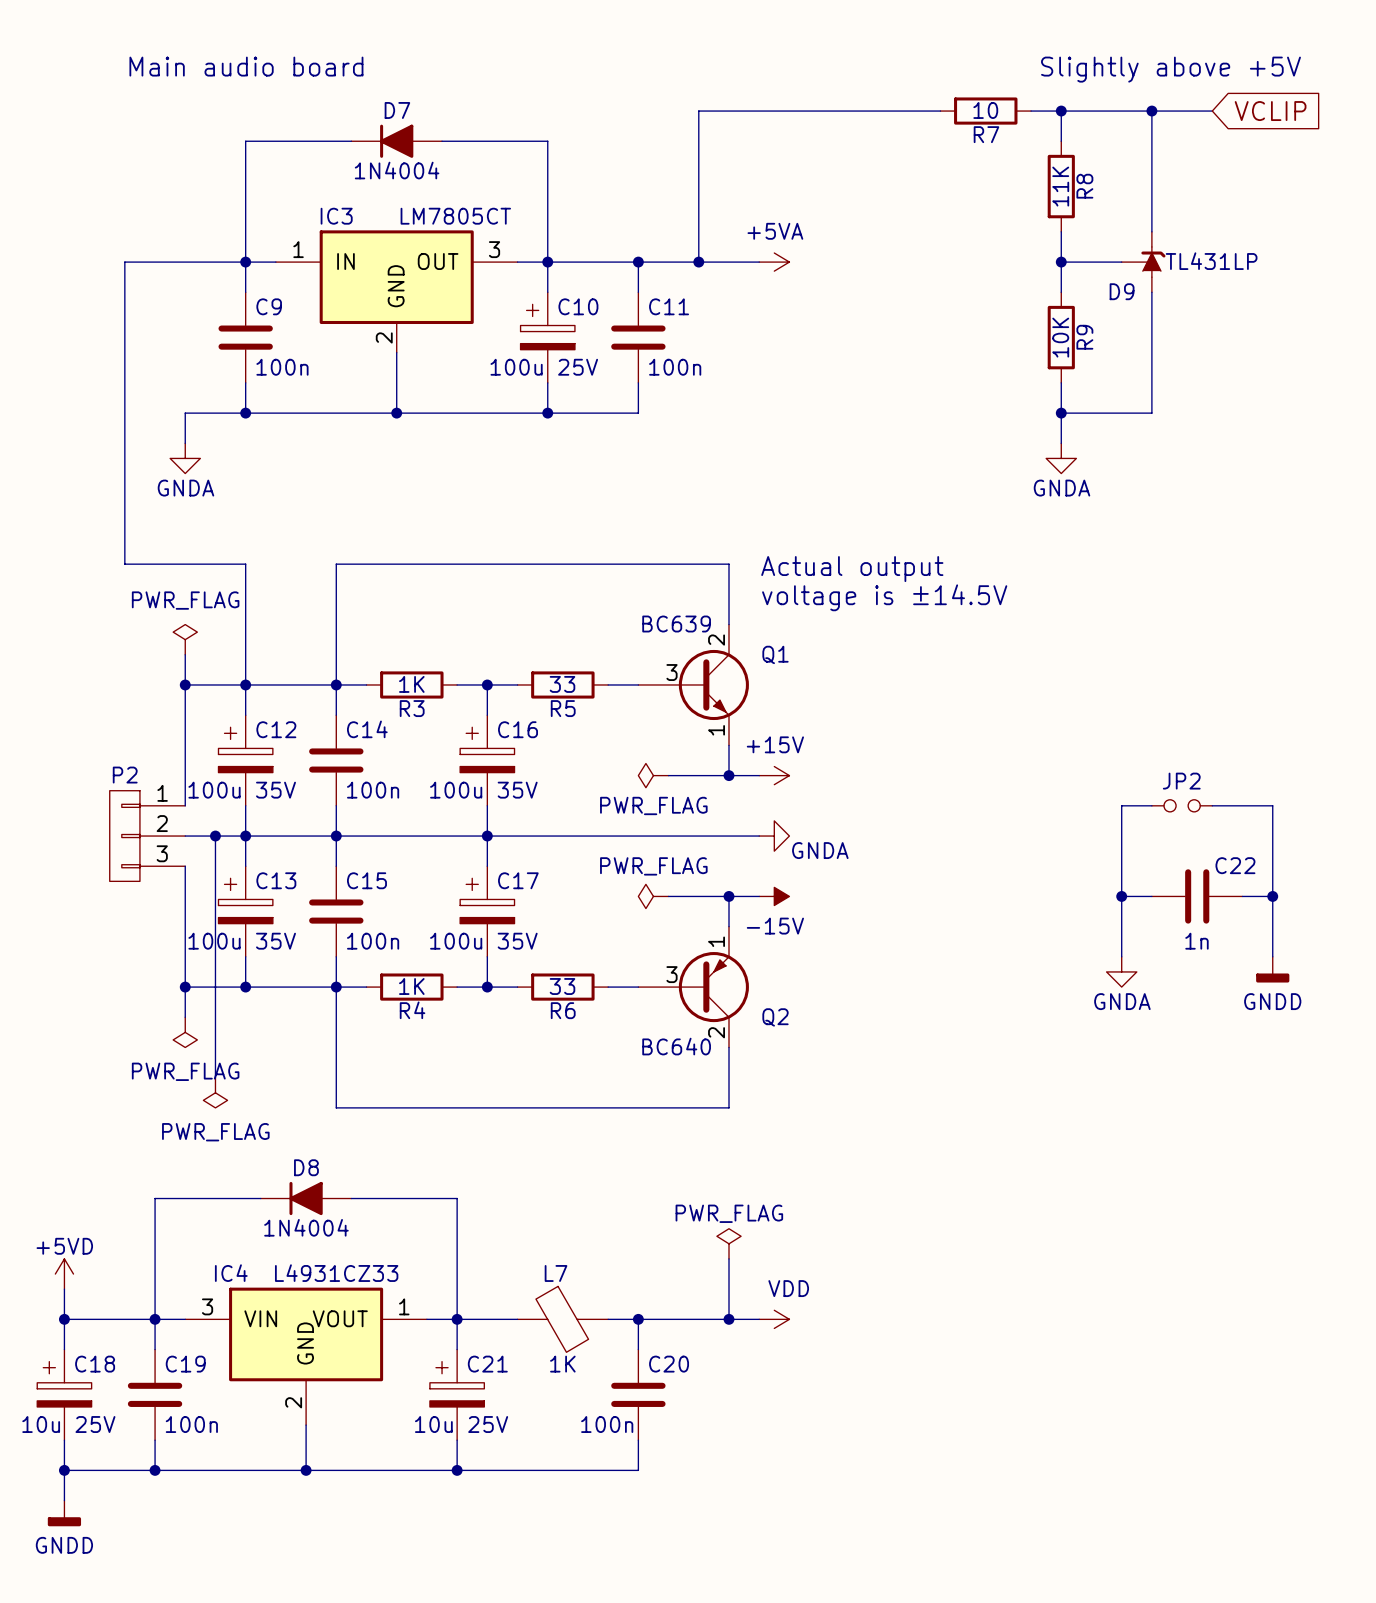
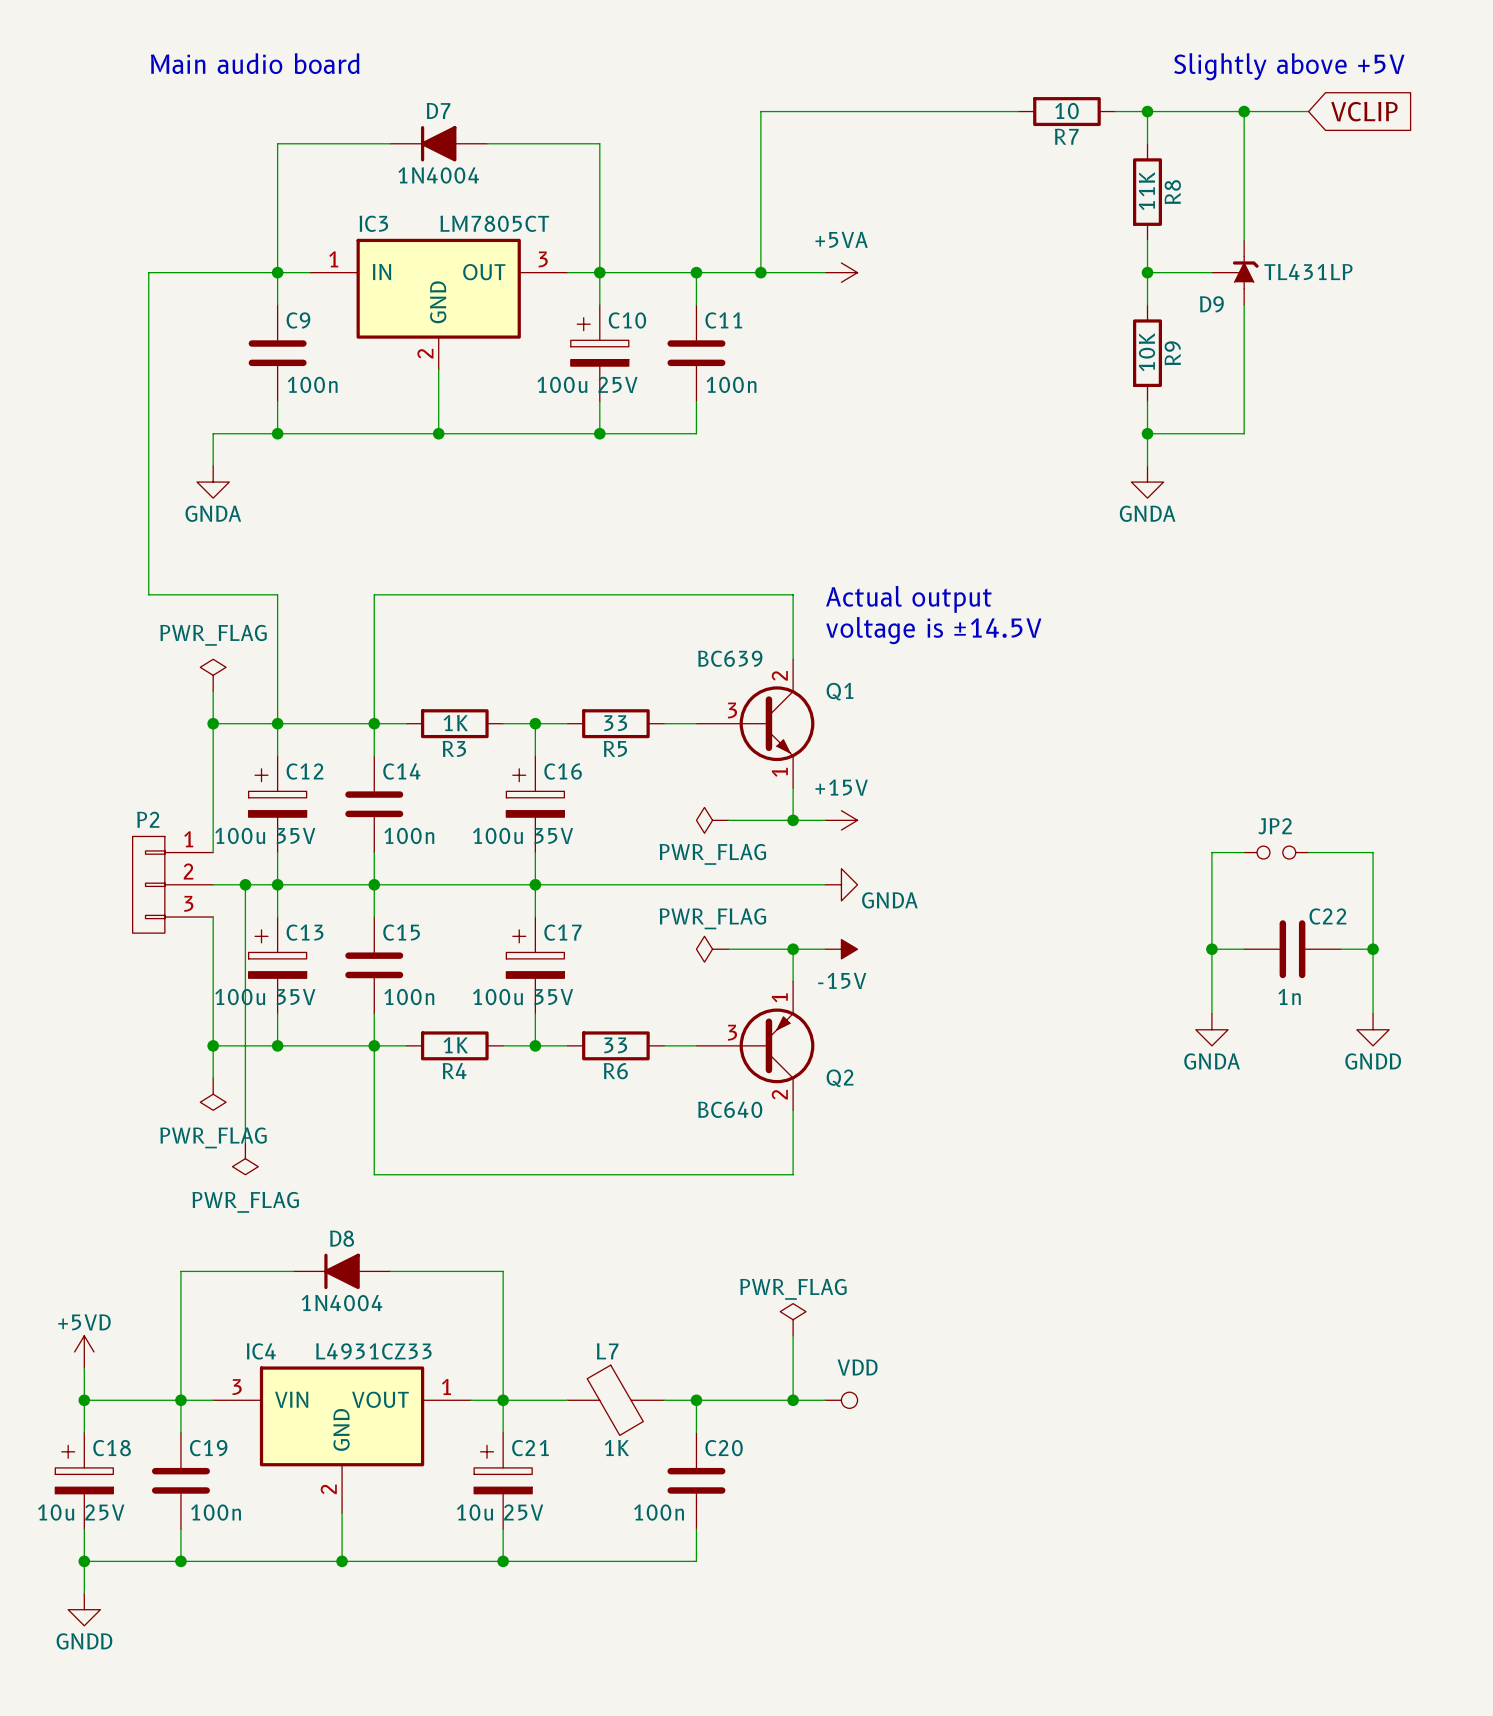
power symbol shape: [1256, 956, 1290, 983] -> [1356, 1013, 1390, 1046]
power symbol shape: [759, 1310, 790, 1329] -> [825, 1392, 858, 1409]
power symbol shape: [47, 1500, 82, 1527] -> [68, 1593, 101, 1626]

